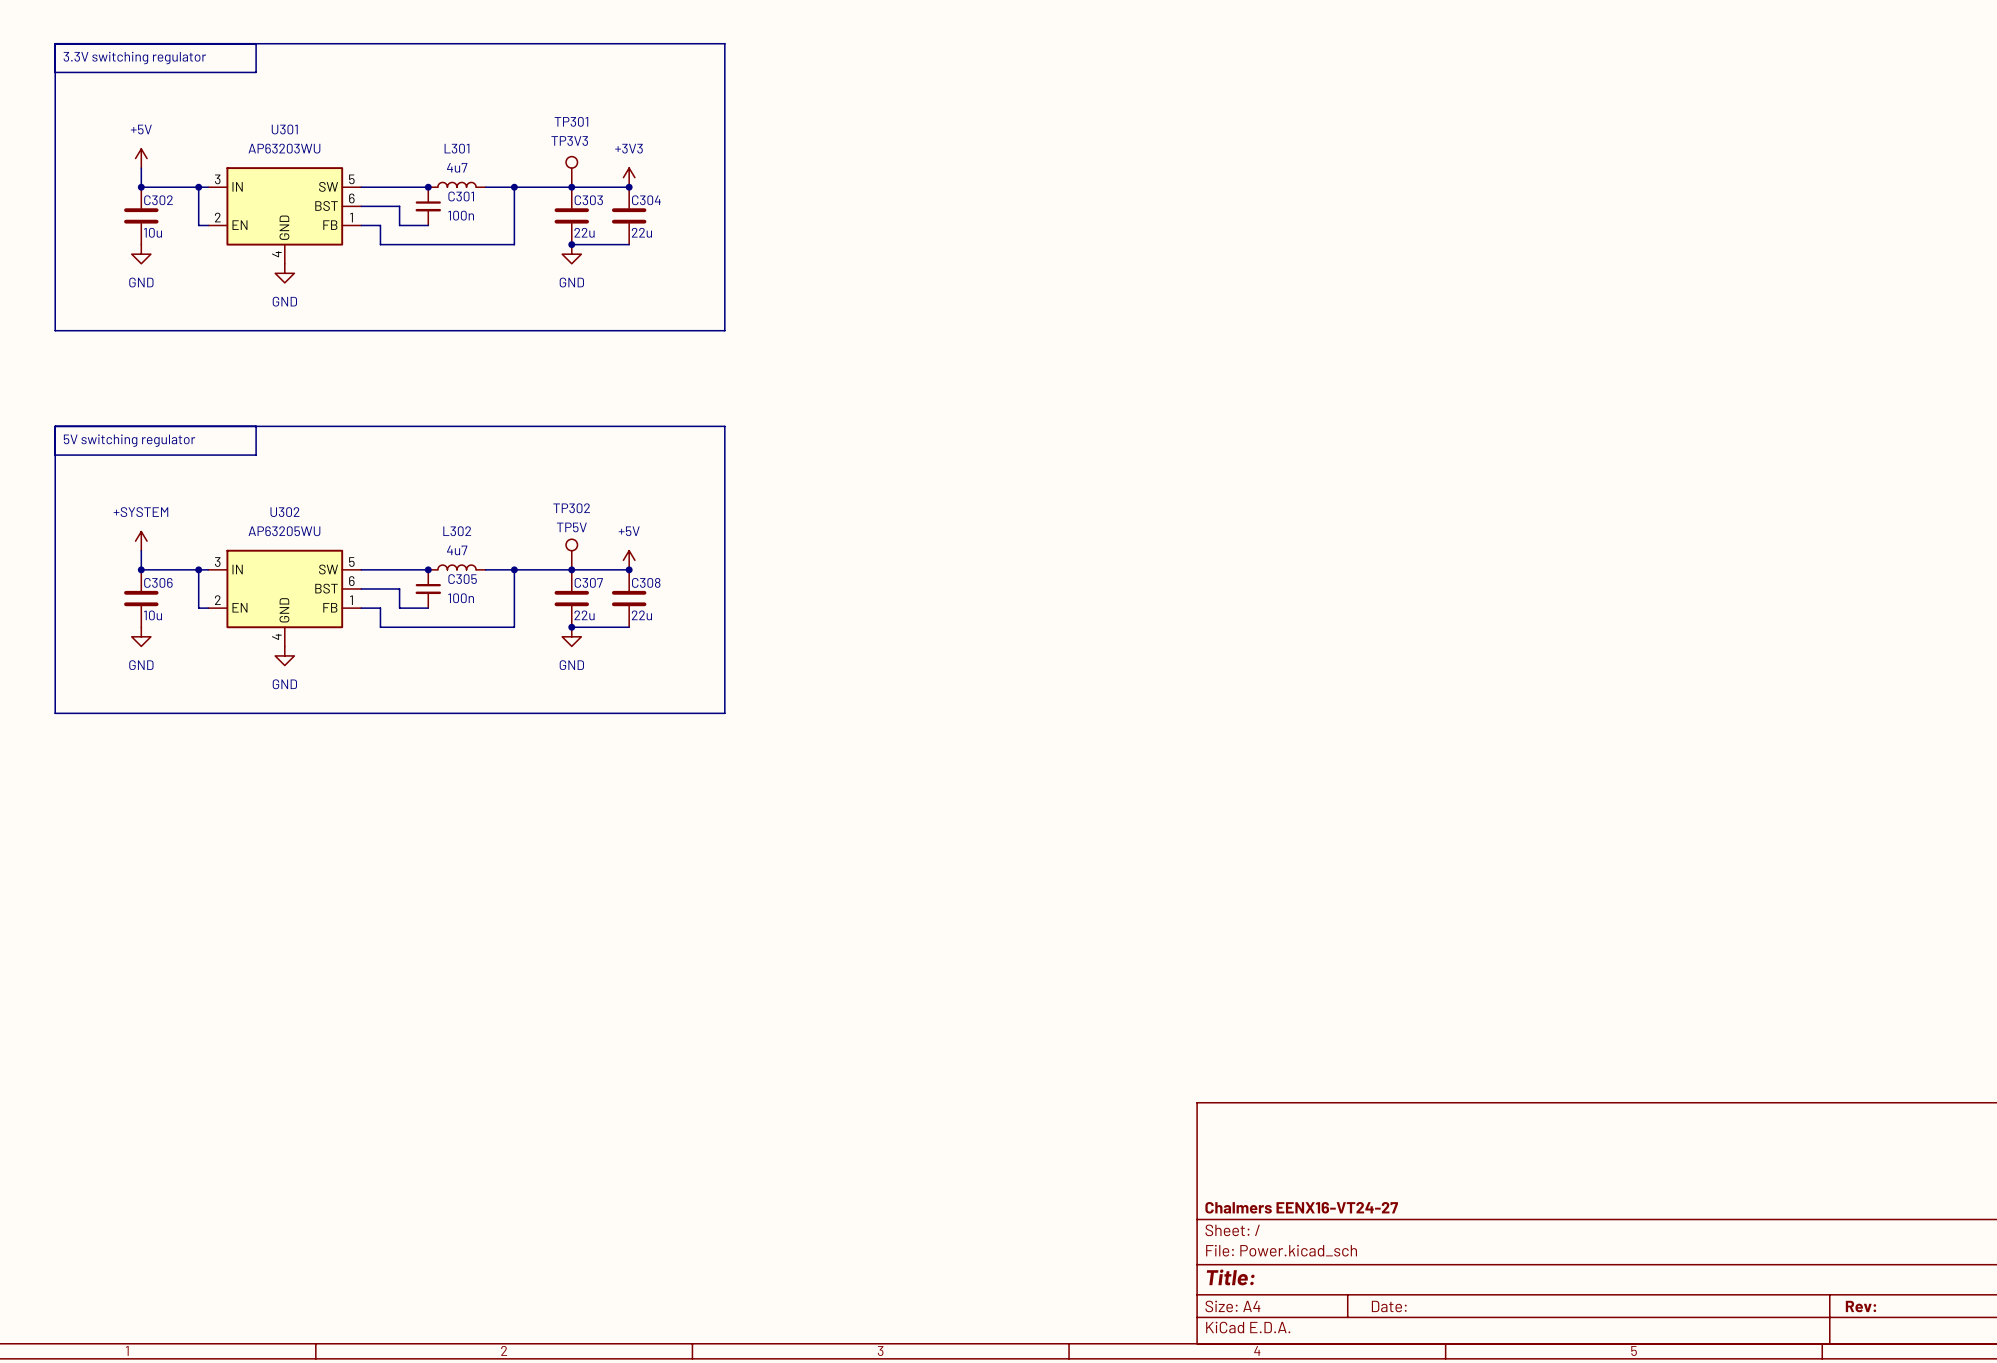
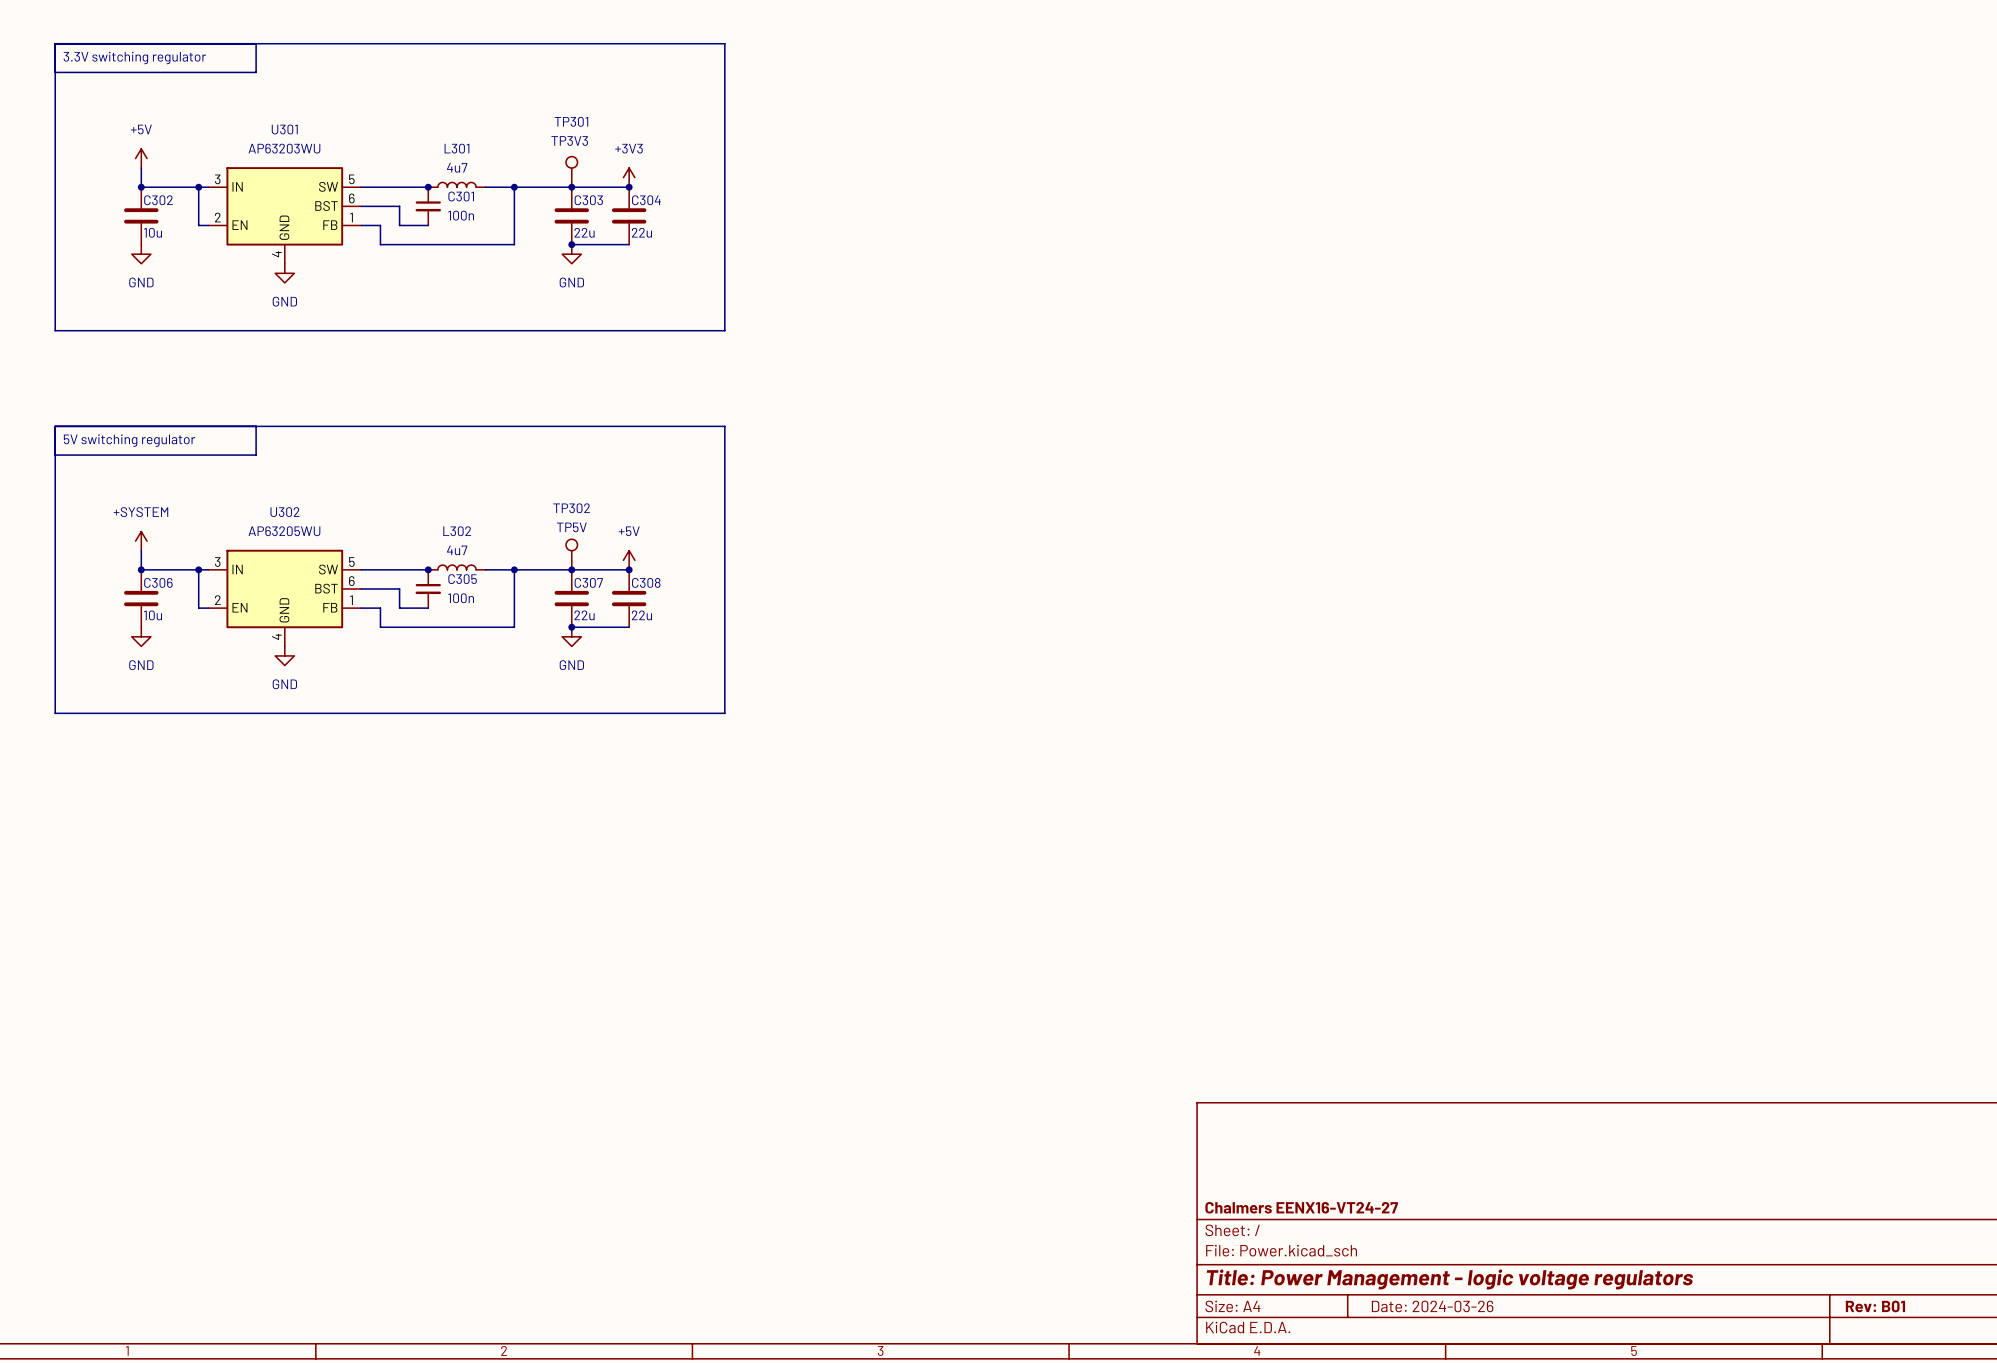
title block: Title: (1230, 1277) -> Title: Power Management - logic voltage regulators (1449, 1279)
title block: Date: (1389, 1306) -> Date: 2024-03-26 (1432, 1306)
title block: Rev: (1860, 1306) -> Rev: B01 (1875, 1306)

